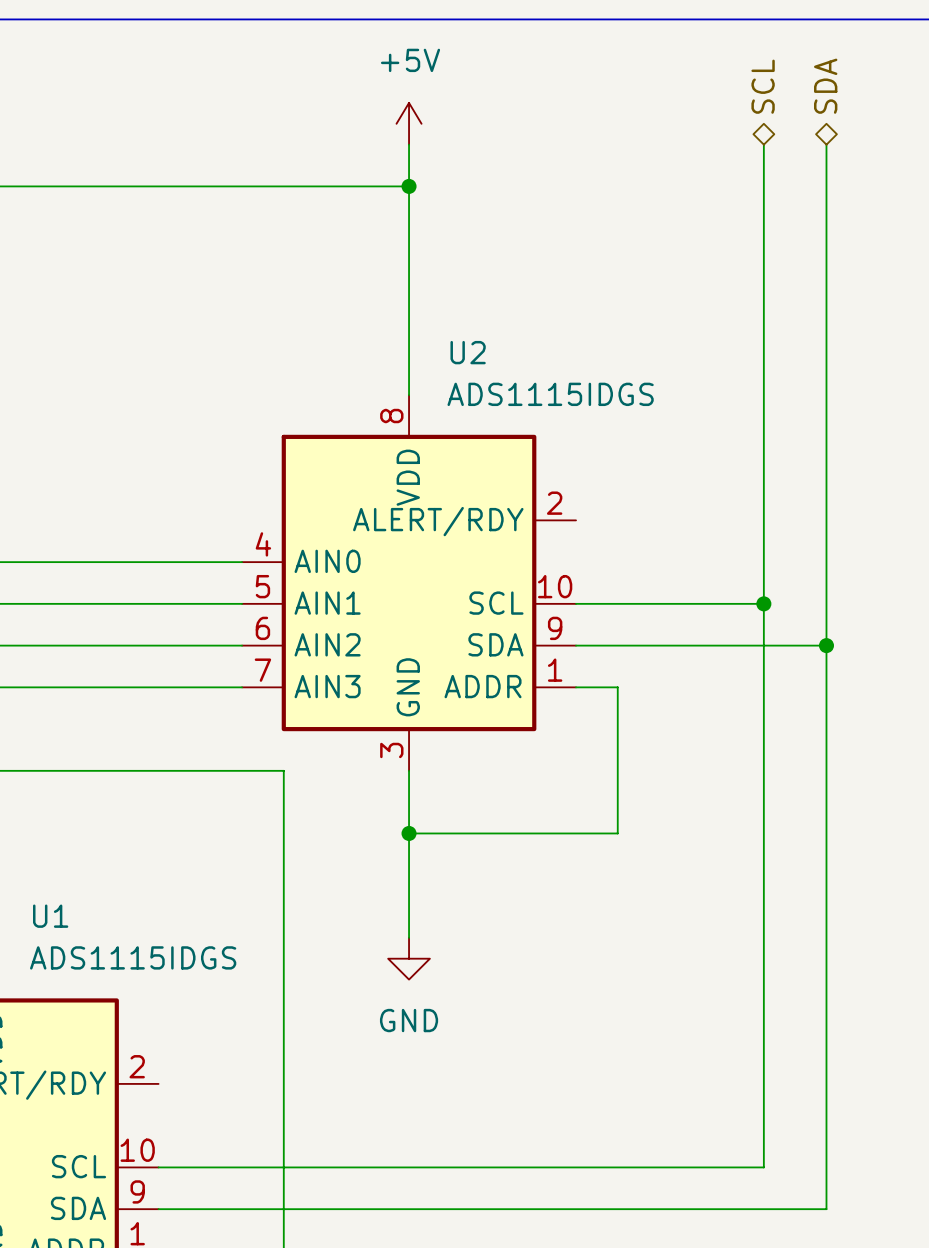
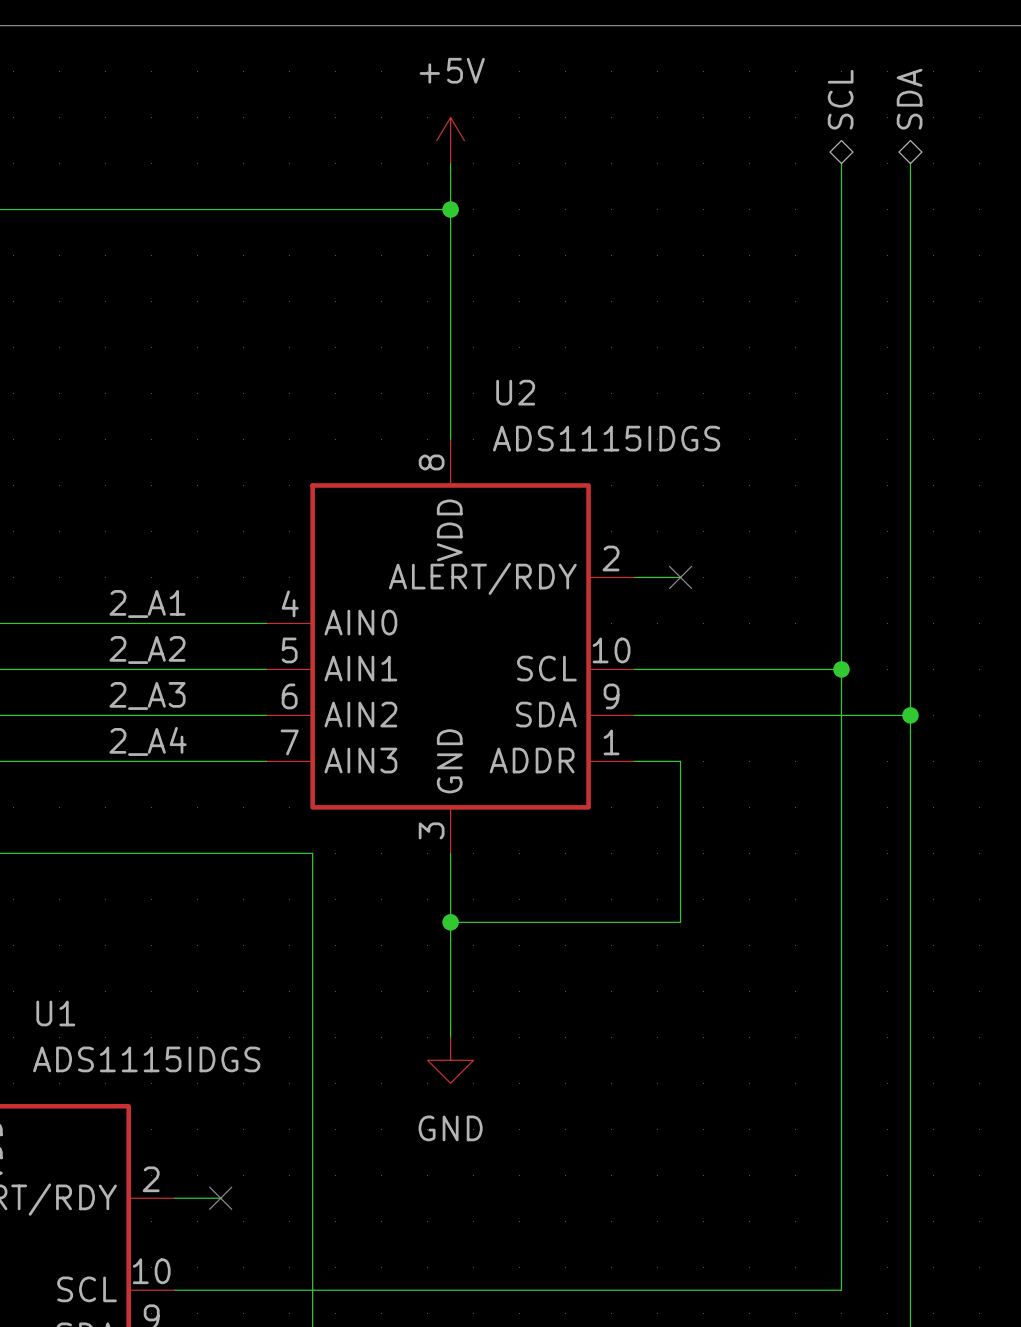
wire: none -> (634, 577) (680, 577)
no-connect mark: none -> (680, 577)
label: none -> 2_A1 (147, 604)
label: none -> 2_A2 (147, 649)
label: none -> 2_A3 (147, 695)
label: none -> 2_A4 (148, 741)
wire: none -> (174, 1198) (220, 1198)
no-connect mark: none -> (220, 1198)

